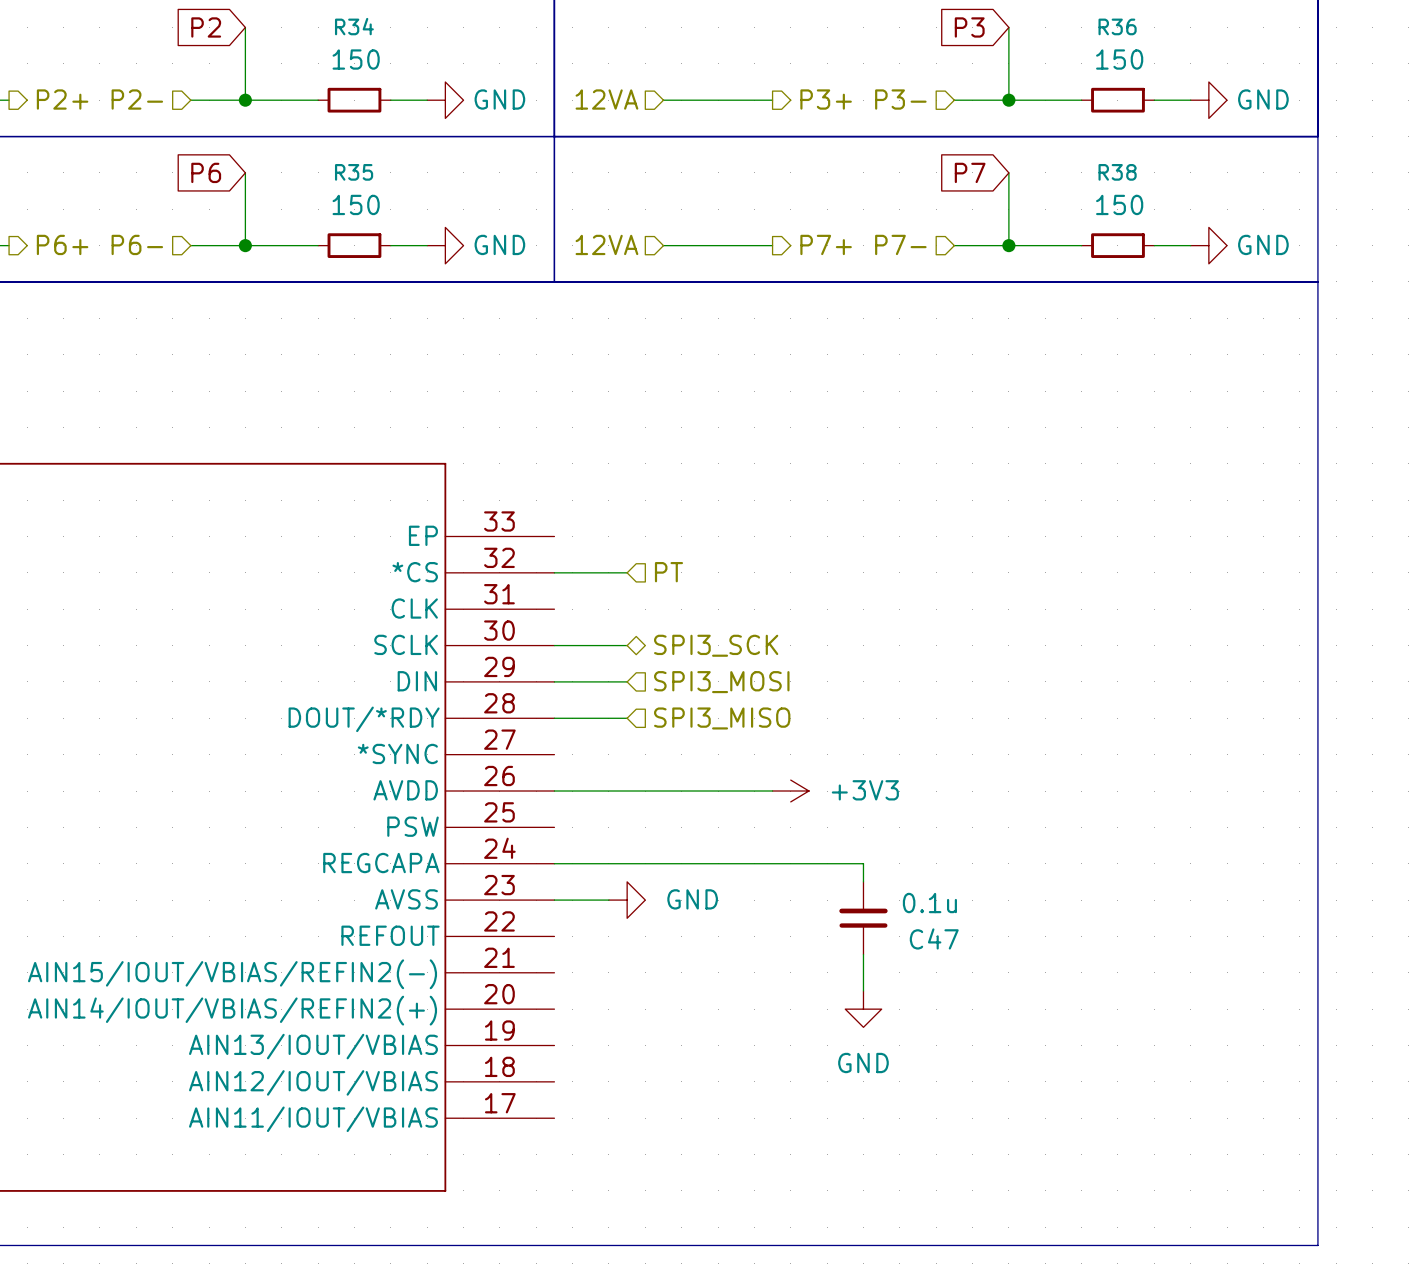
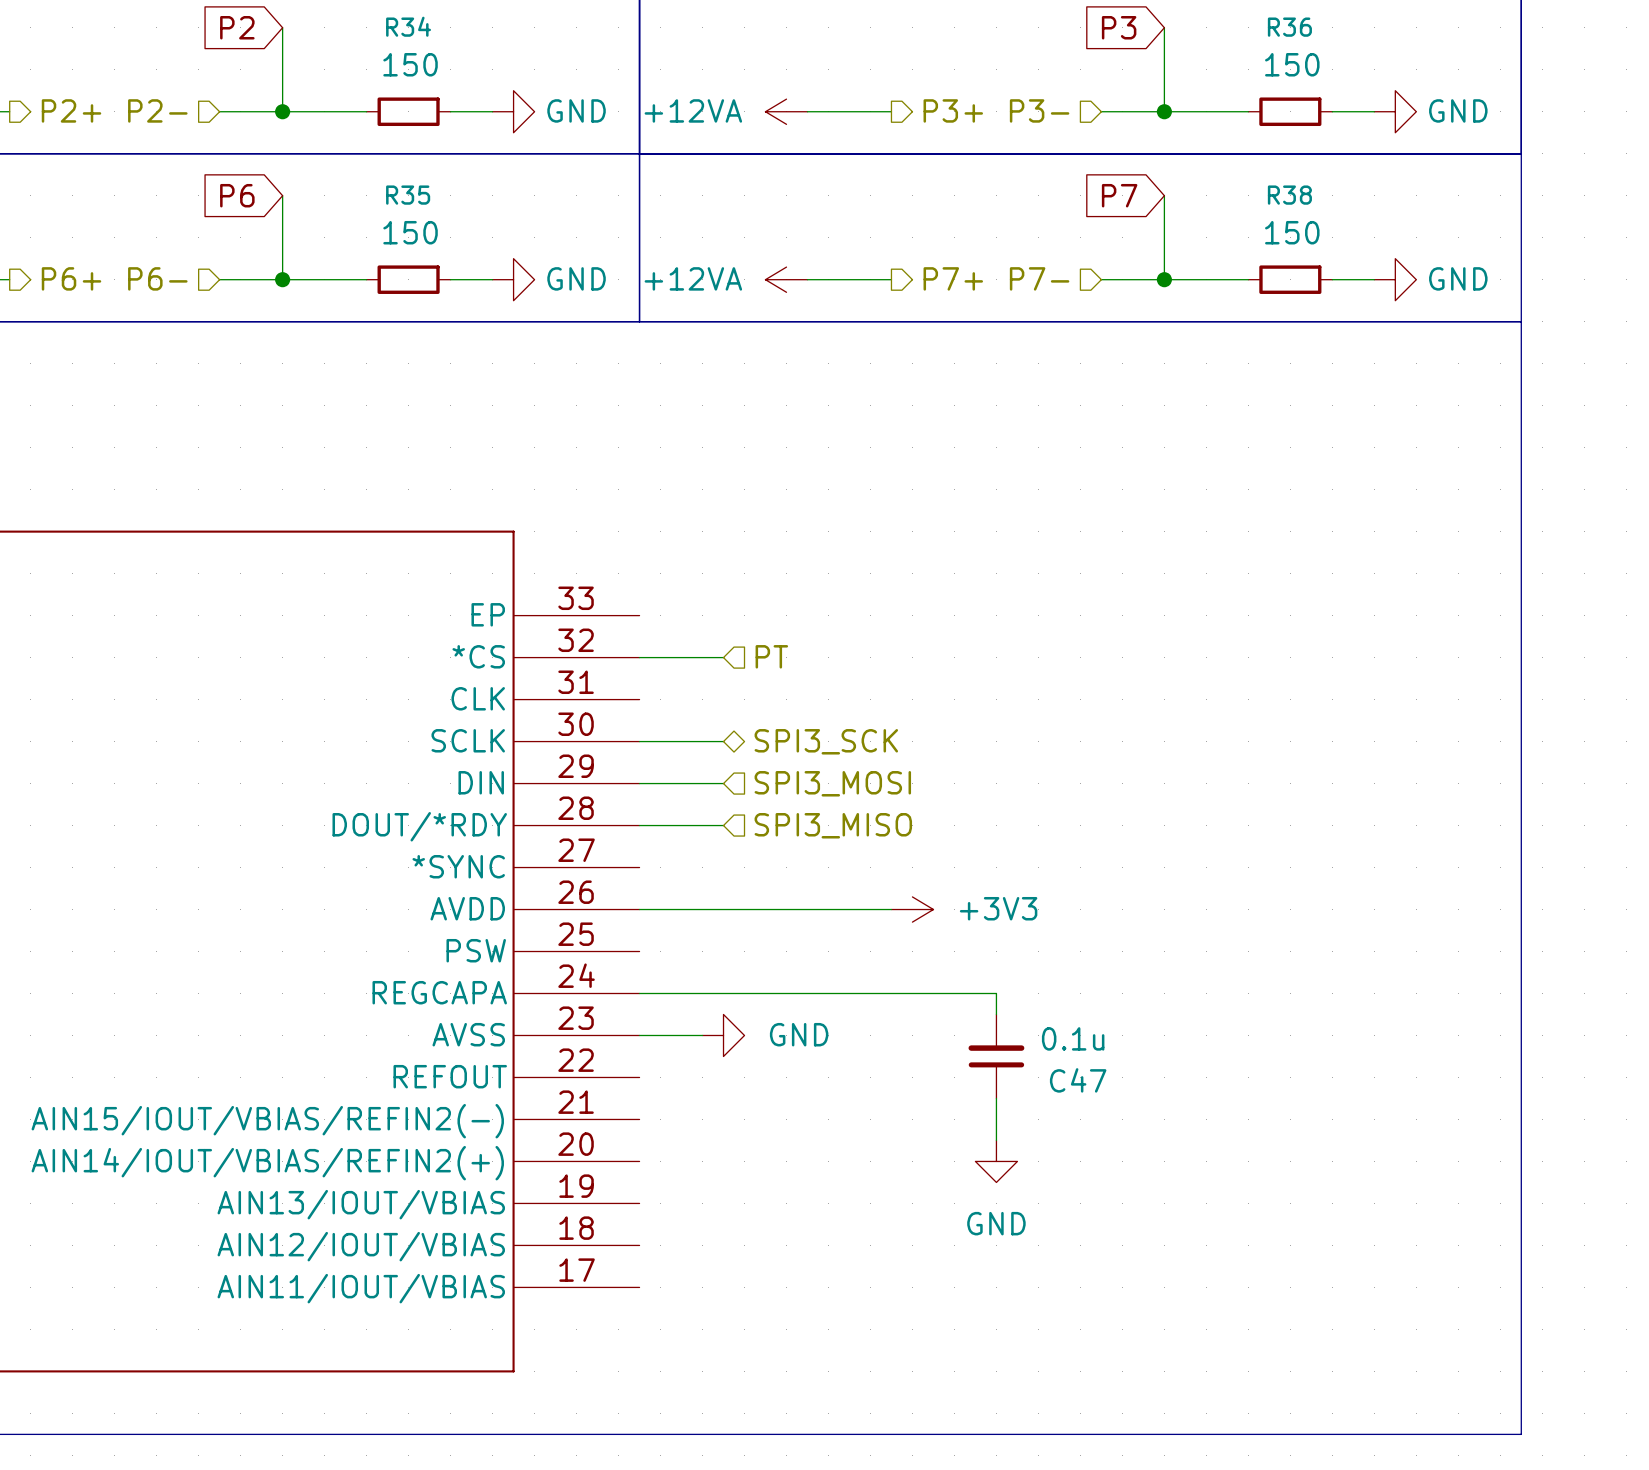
hierarchical label: 12VA (606, 99) -> none
power symbol: none -> +12VA (786, 111)
hierarchical label: 12VA (606, 244) -> none
power symbol: none -> +12VA (786, 279)

